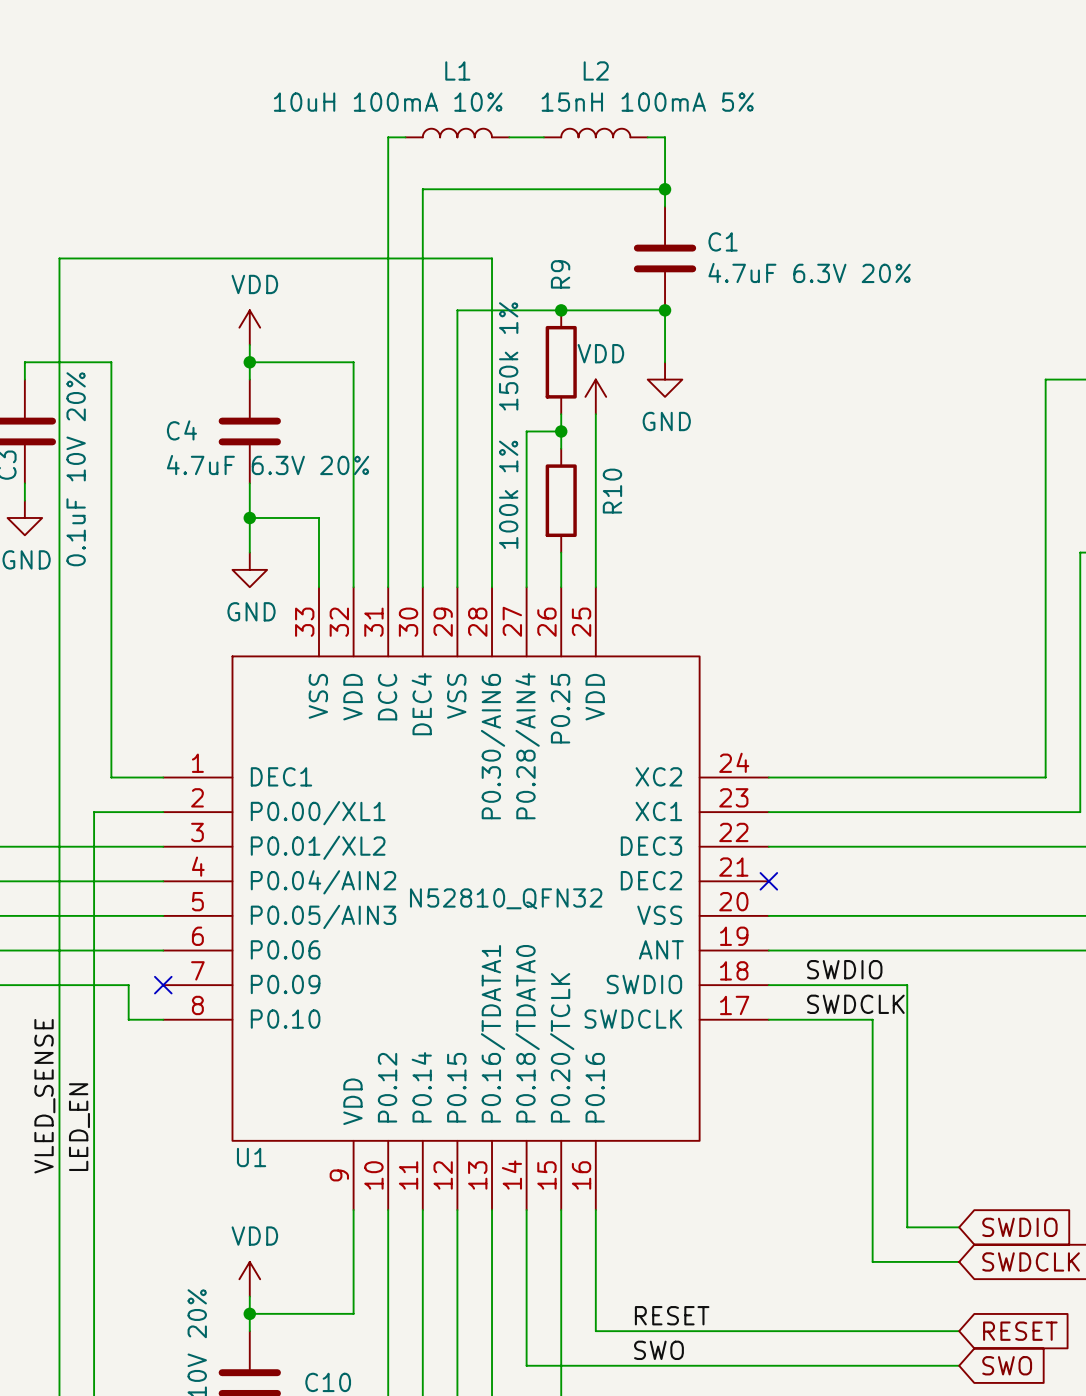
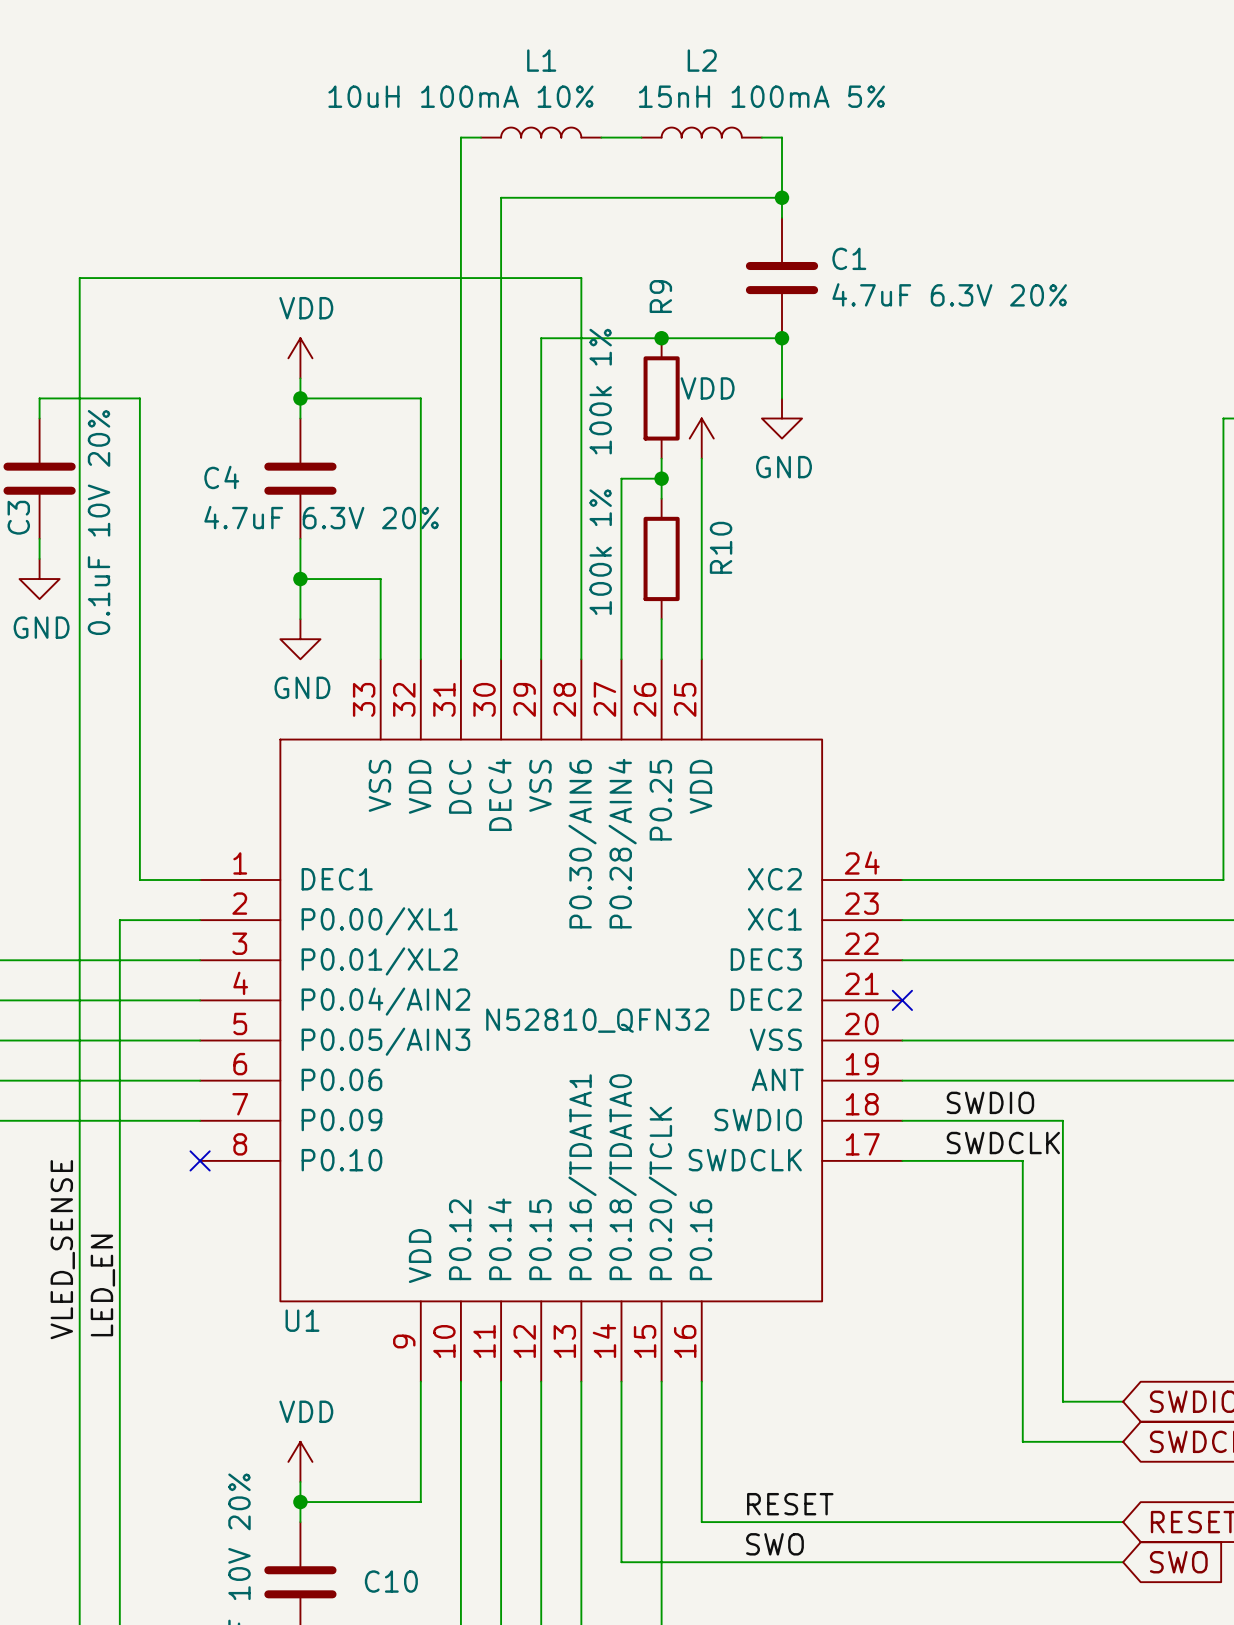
R9 value: 150k 1% (508, 356) -> 100k 1% (600, 391)
wire: (128, 985) (128, 1019) (163, 1019) -> (159, 1120) (200, 1120)
no-connect mark position: (163, 985) -> (200, 1160)

